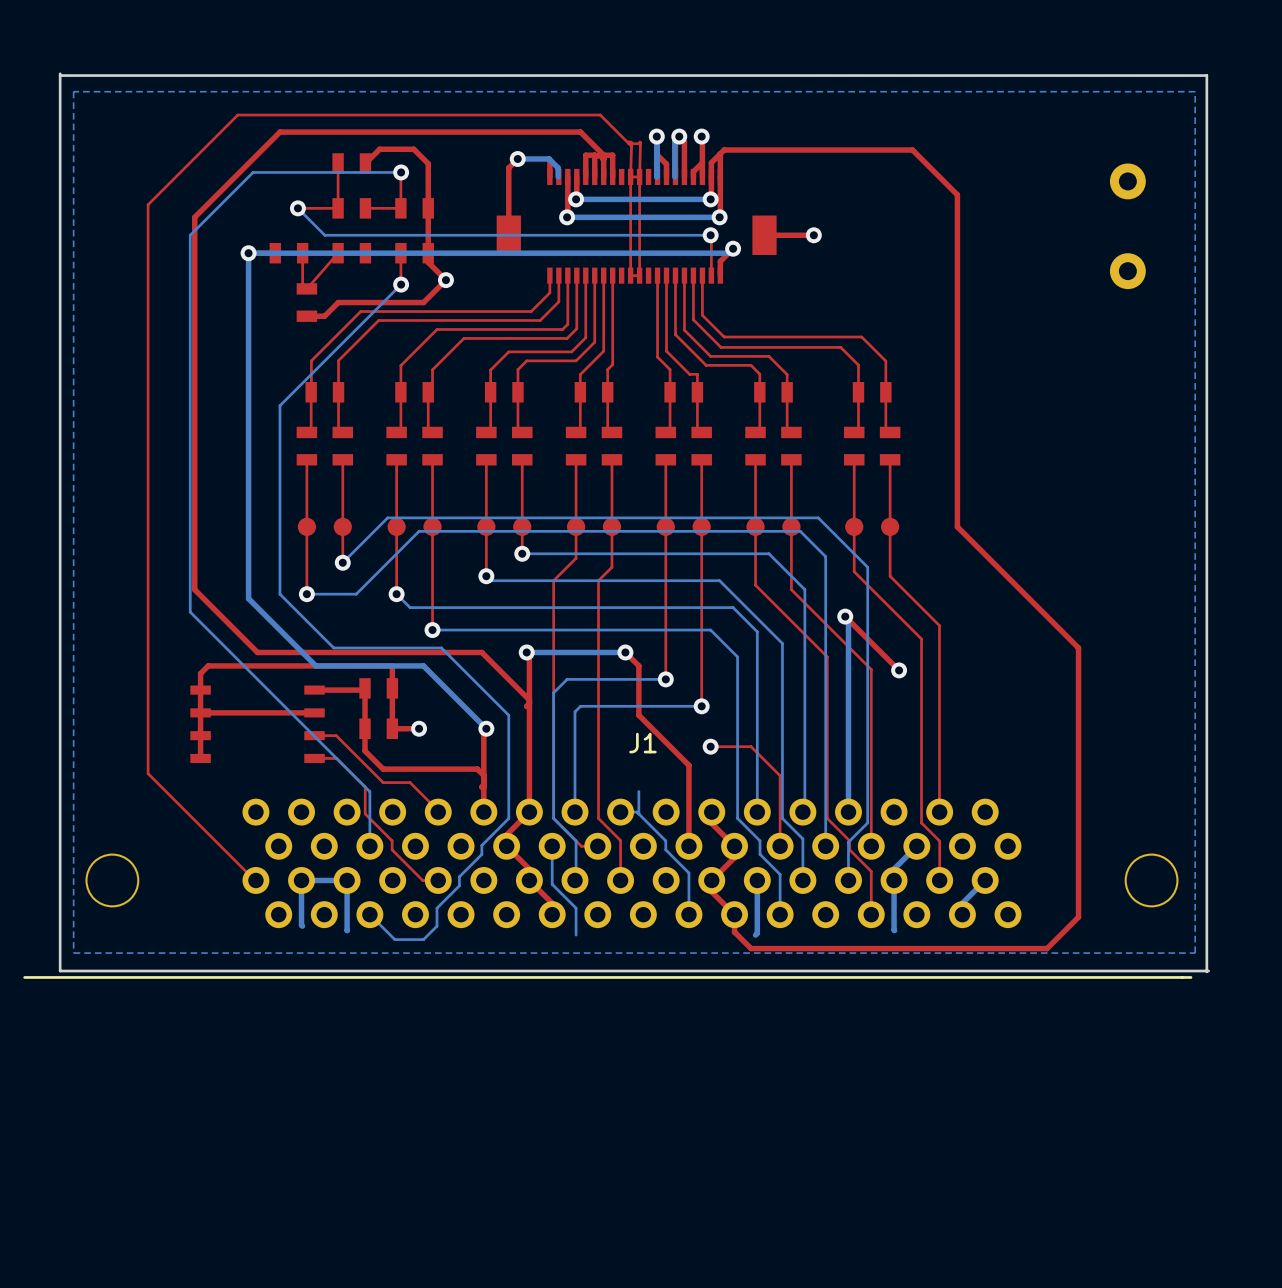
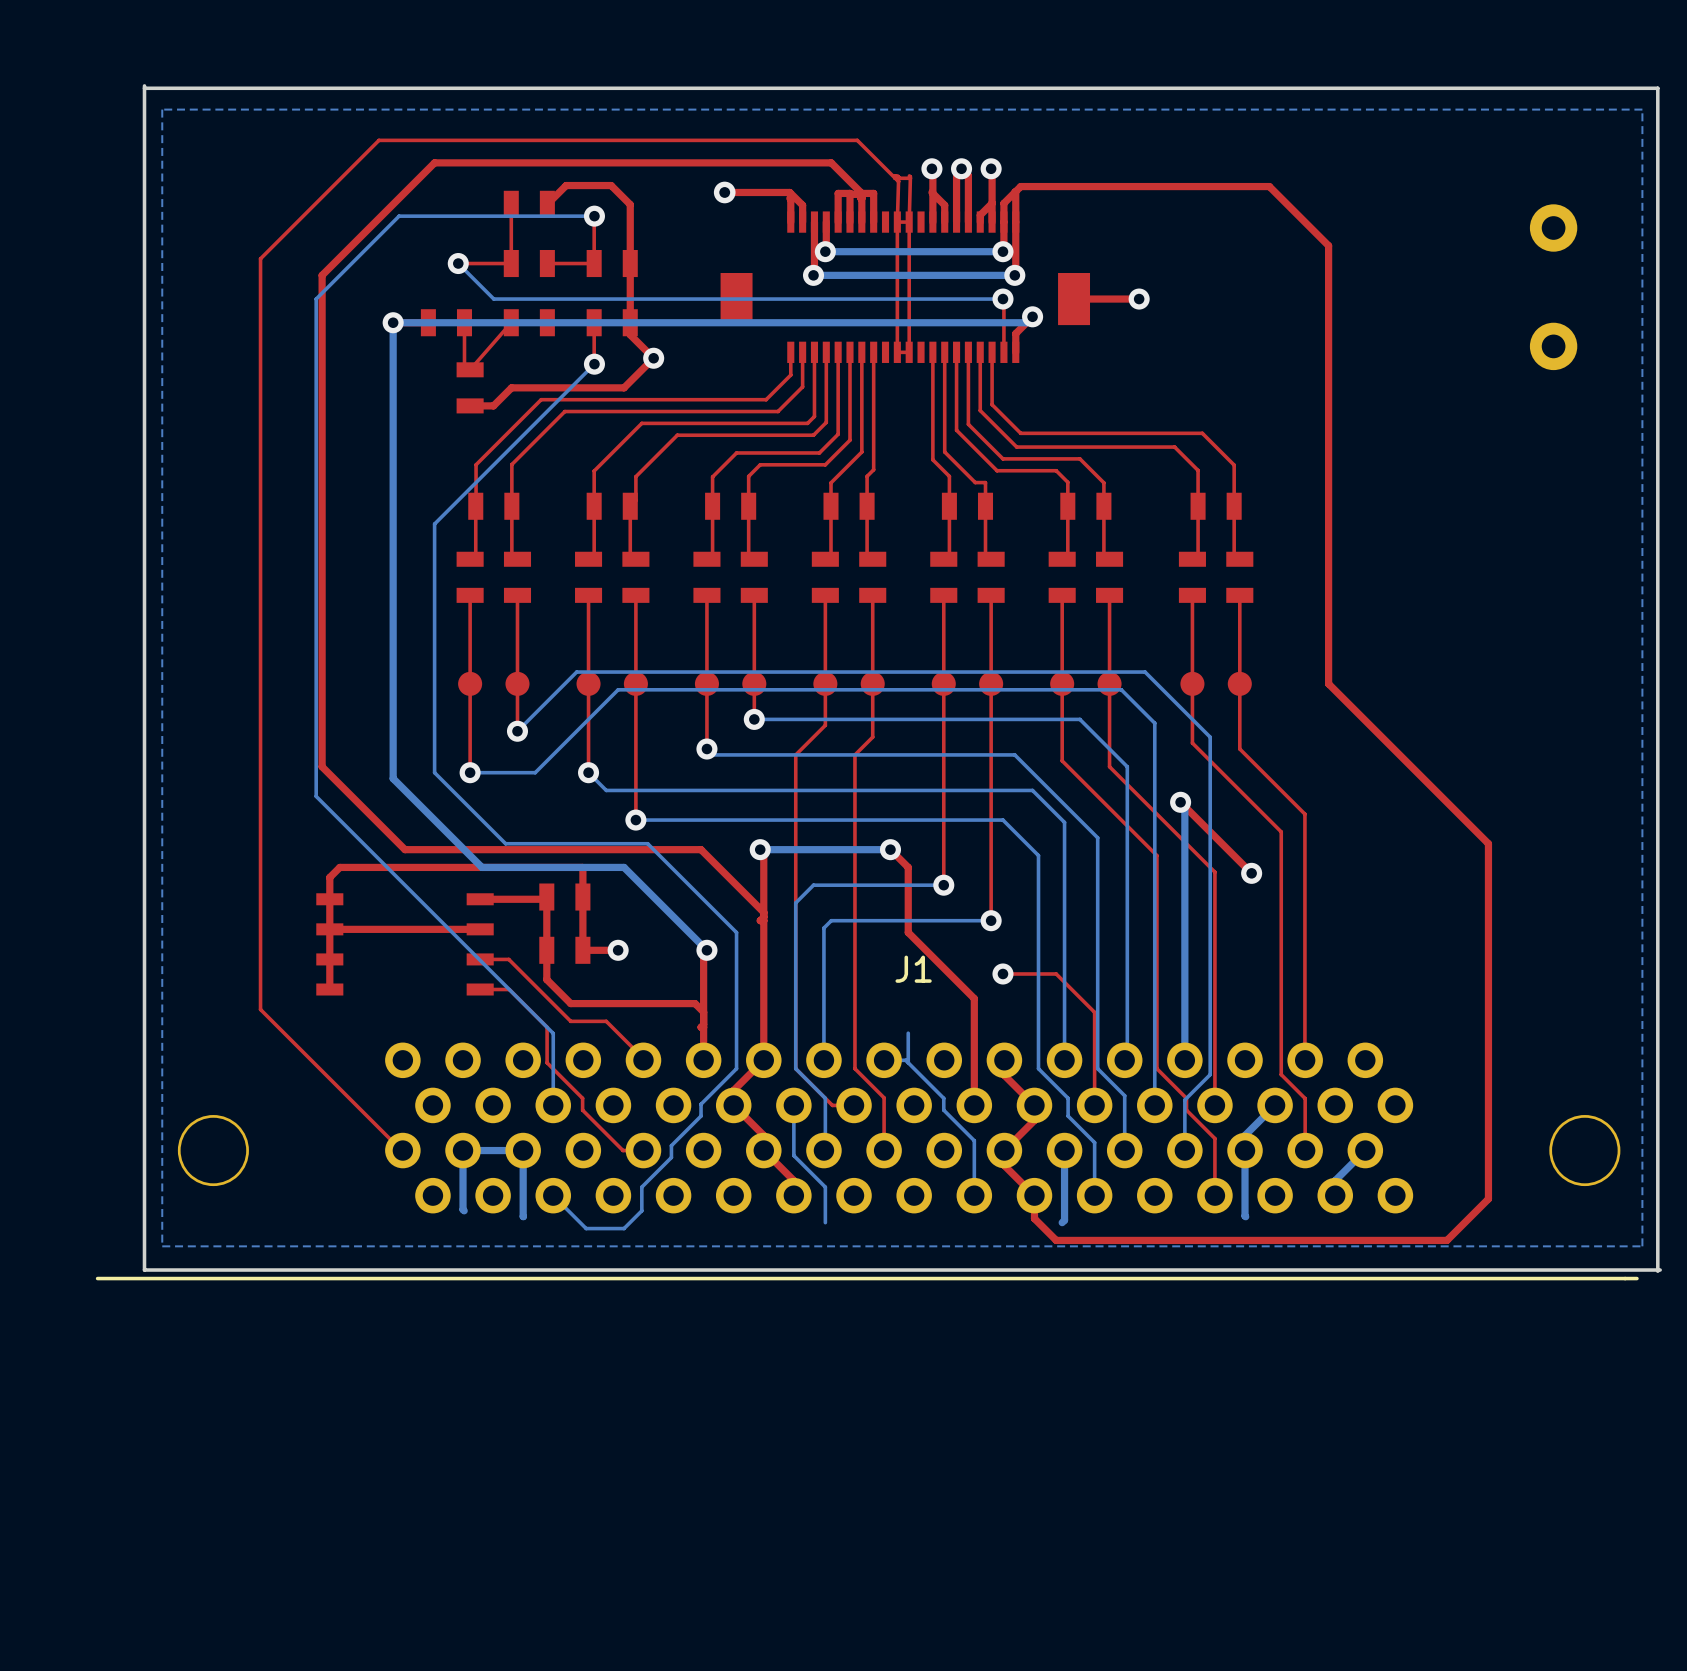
bottom track: (656, 136) (656, 176) -> none
top track: none -> (931, 168) (932, 222)
bottom track: (679, 136) (674, 141) (674, 176) -> none
top track: none -> (724, 192) (789, 192) (802, 205) (802, 222)
via: none -> (724, 192)
bottom track: (517, 159) (549, 159) (558, 167) (558, 176) -> none
top track: (517, 159) (508, 167) (508, 235) -> none
via: (517, 159) -> none

